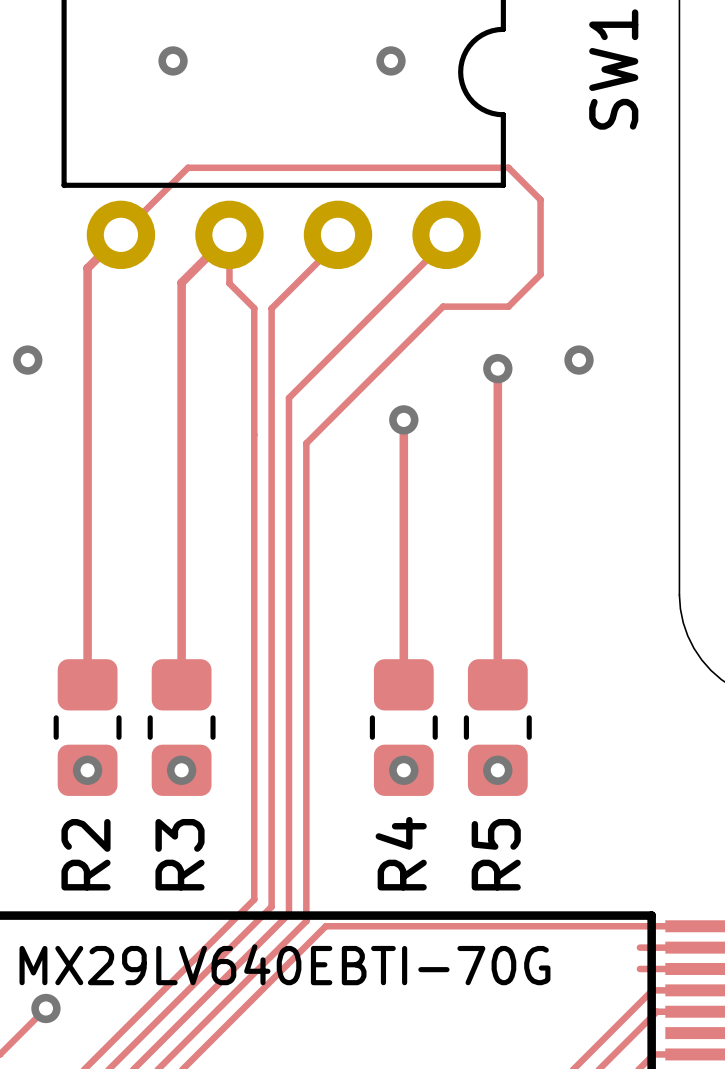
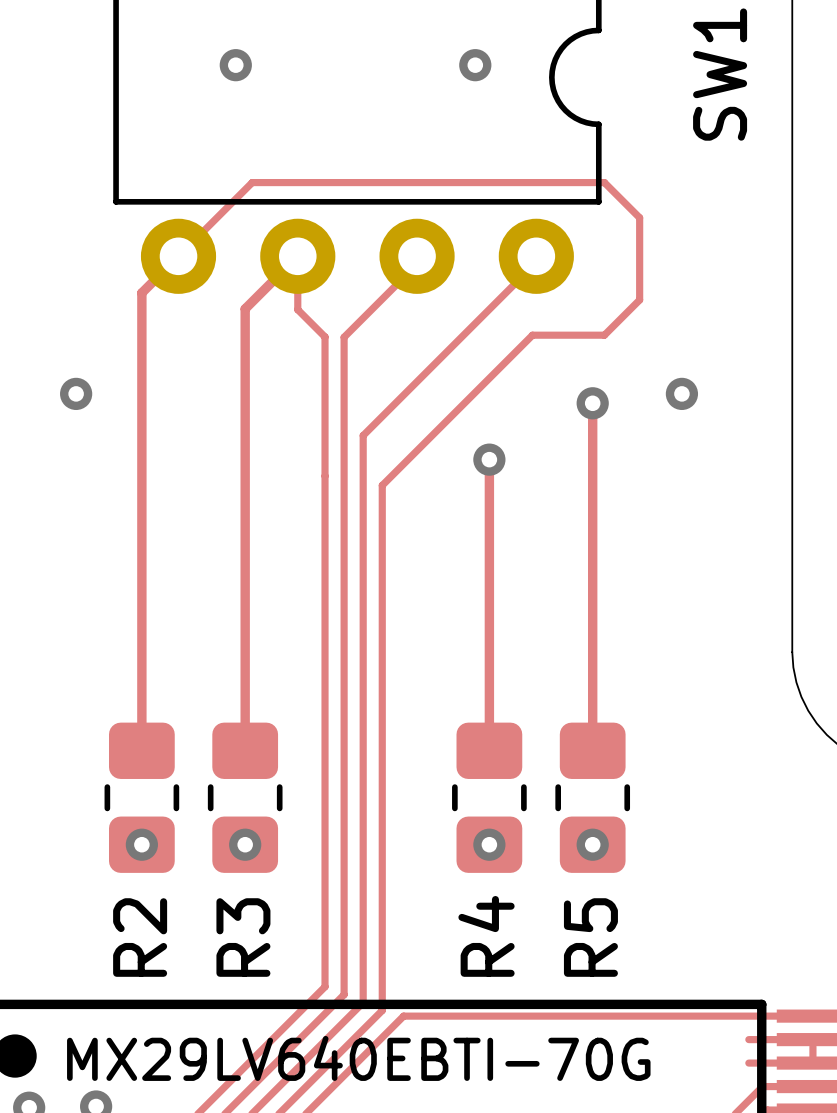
track: none -> (812, 1046) (812, 1063)

